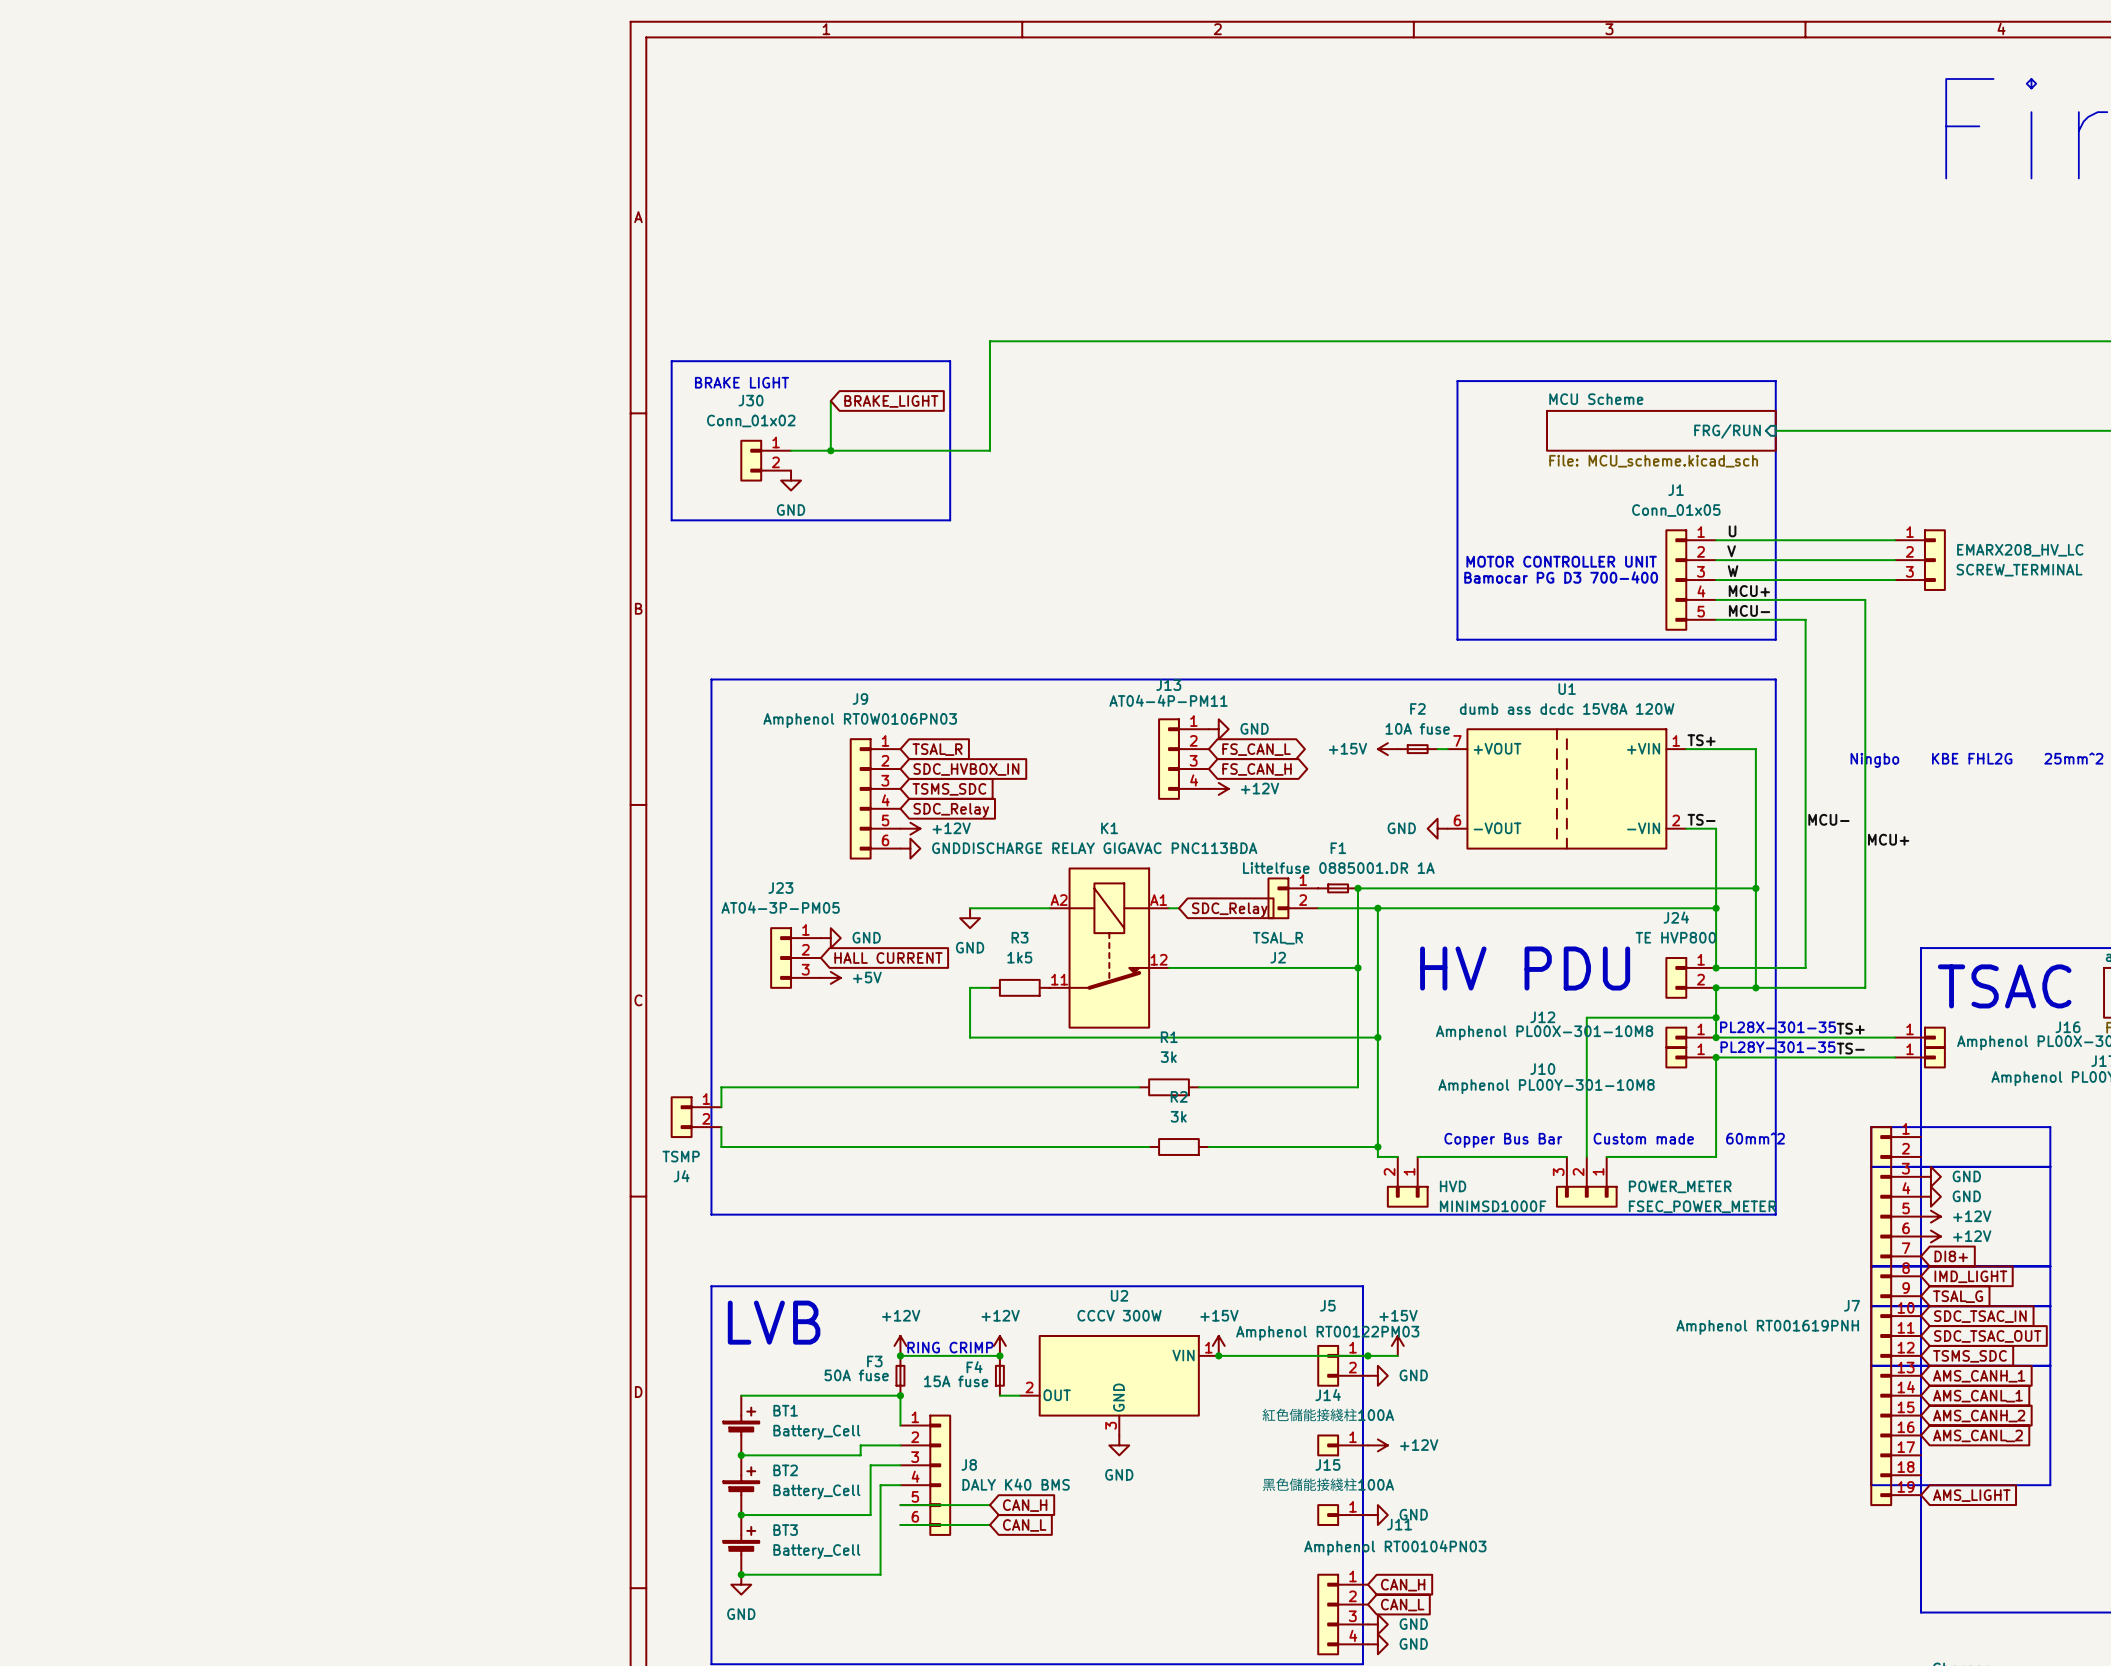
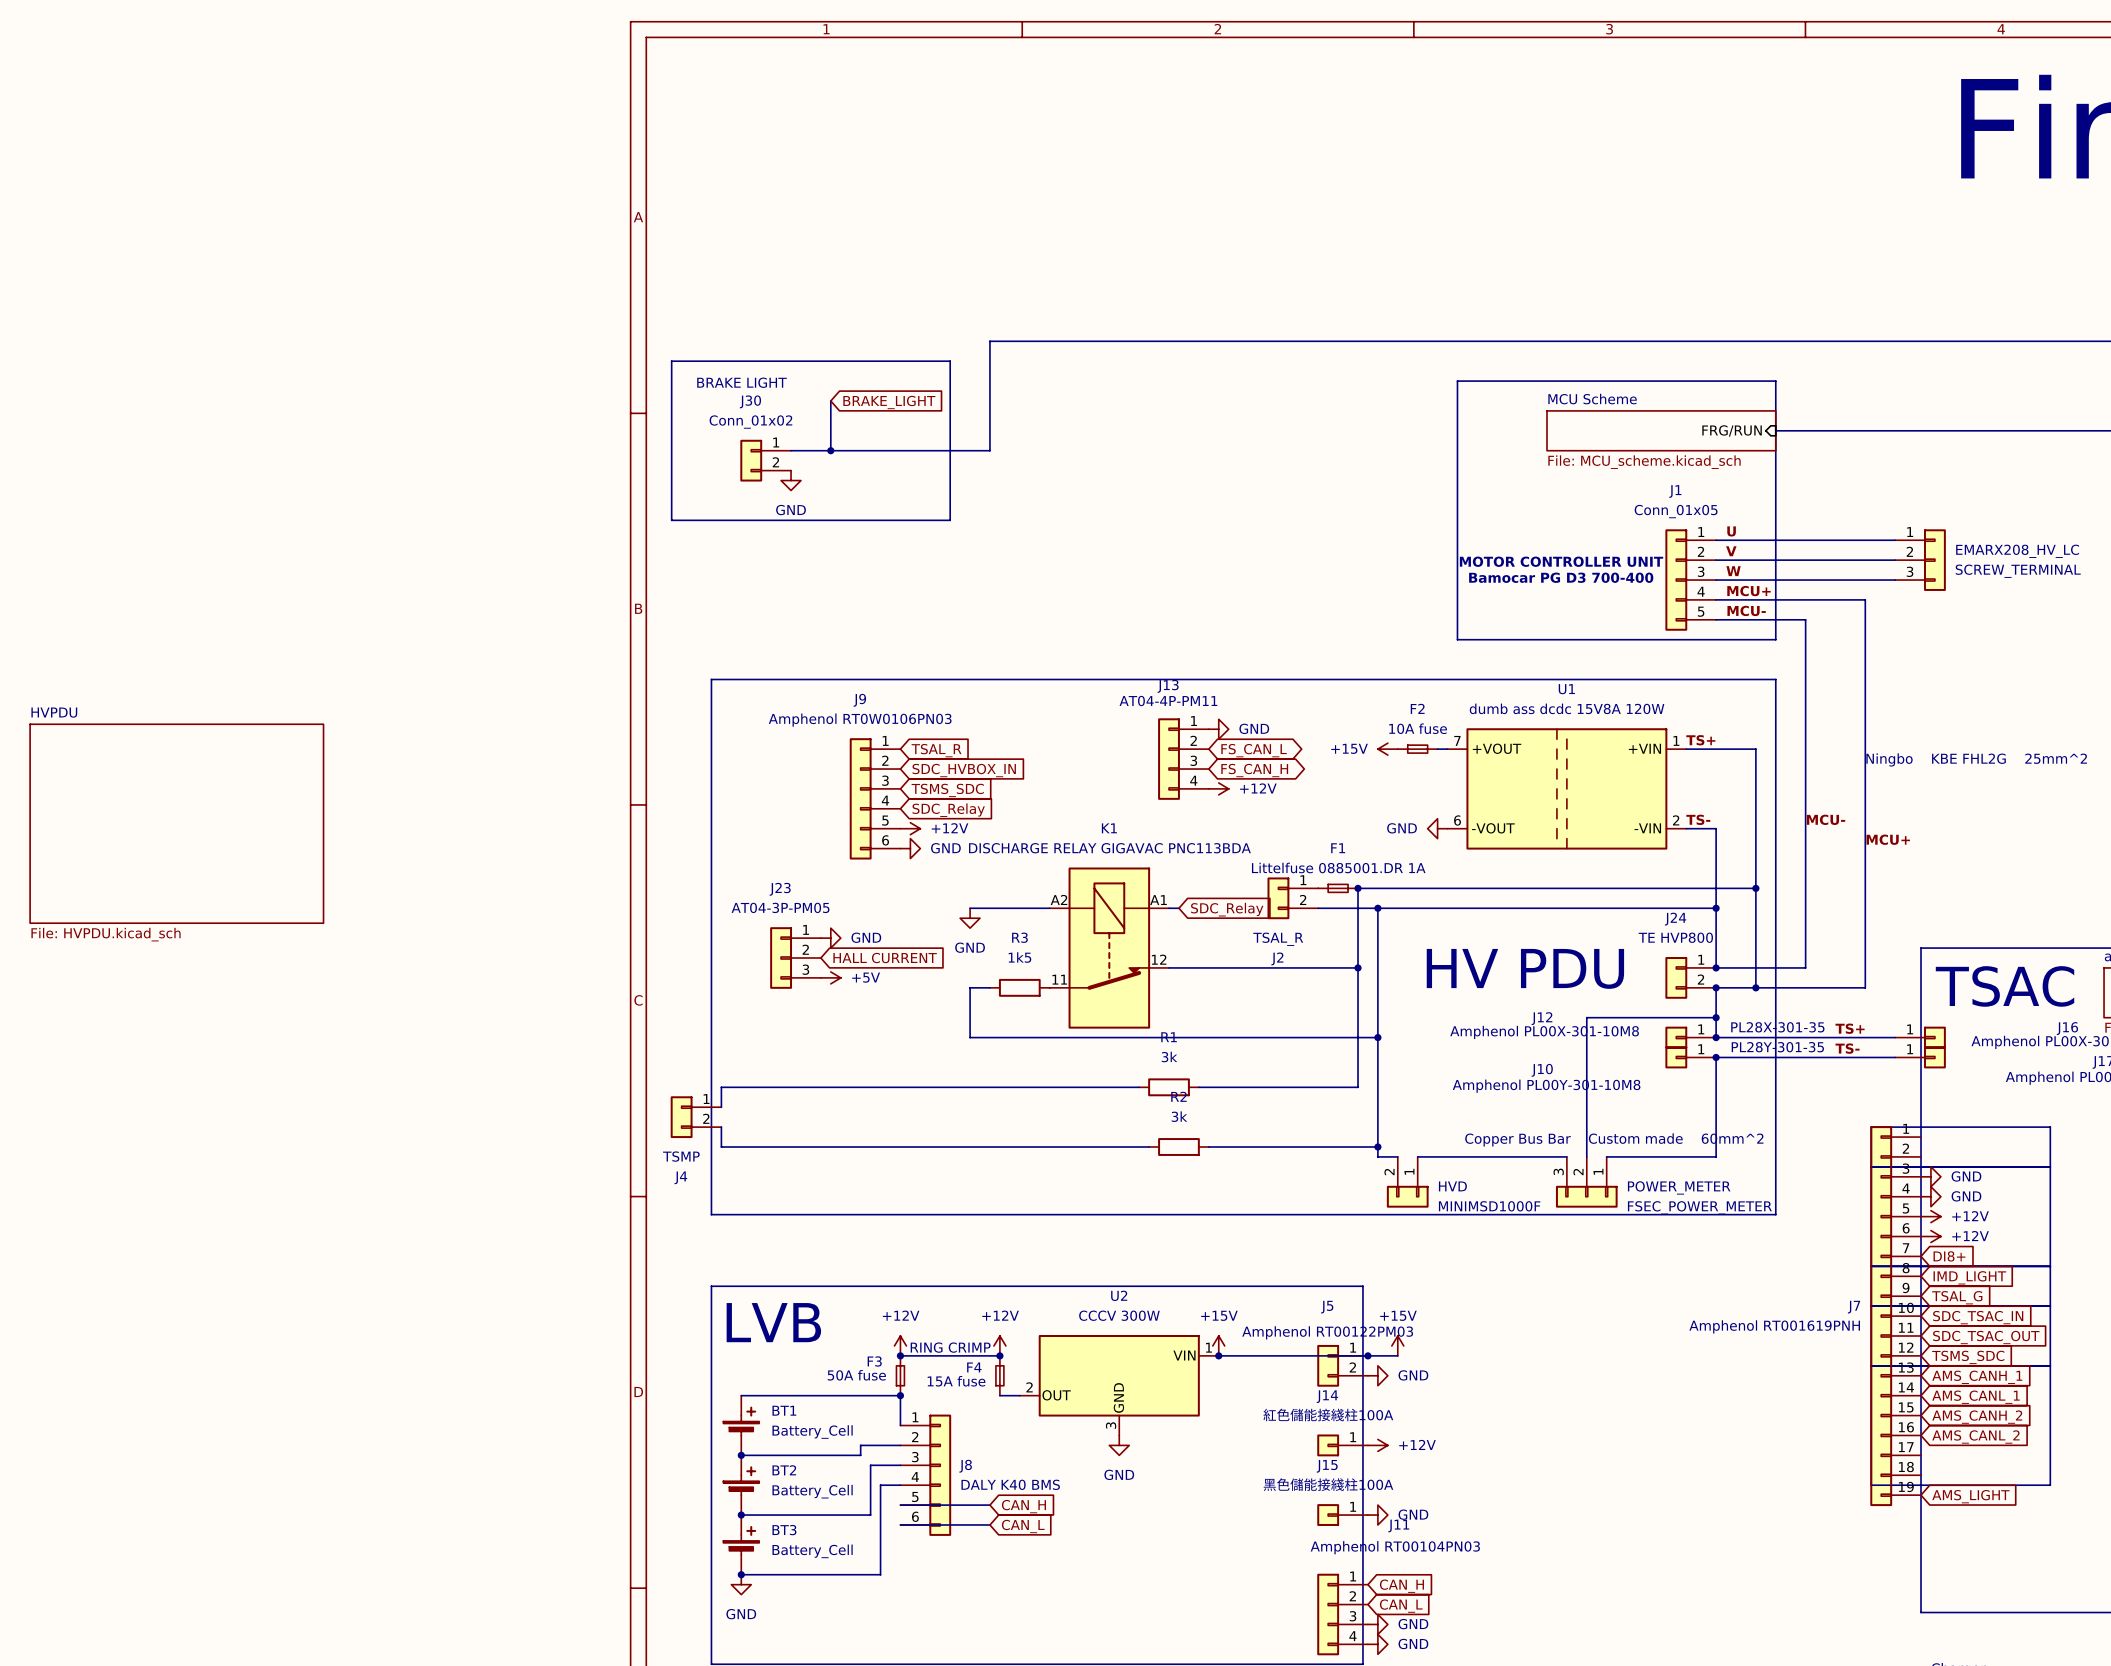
sheet HVPDU: none -> File: HVPDU.kicad_sch (176, 823)

